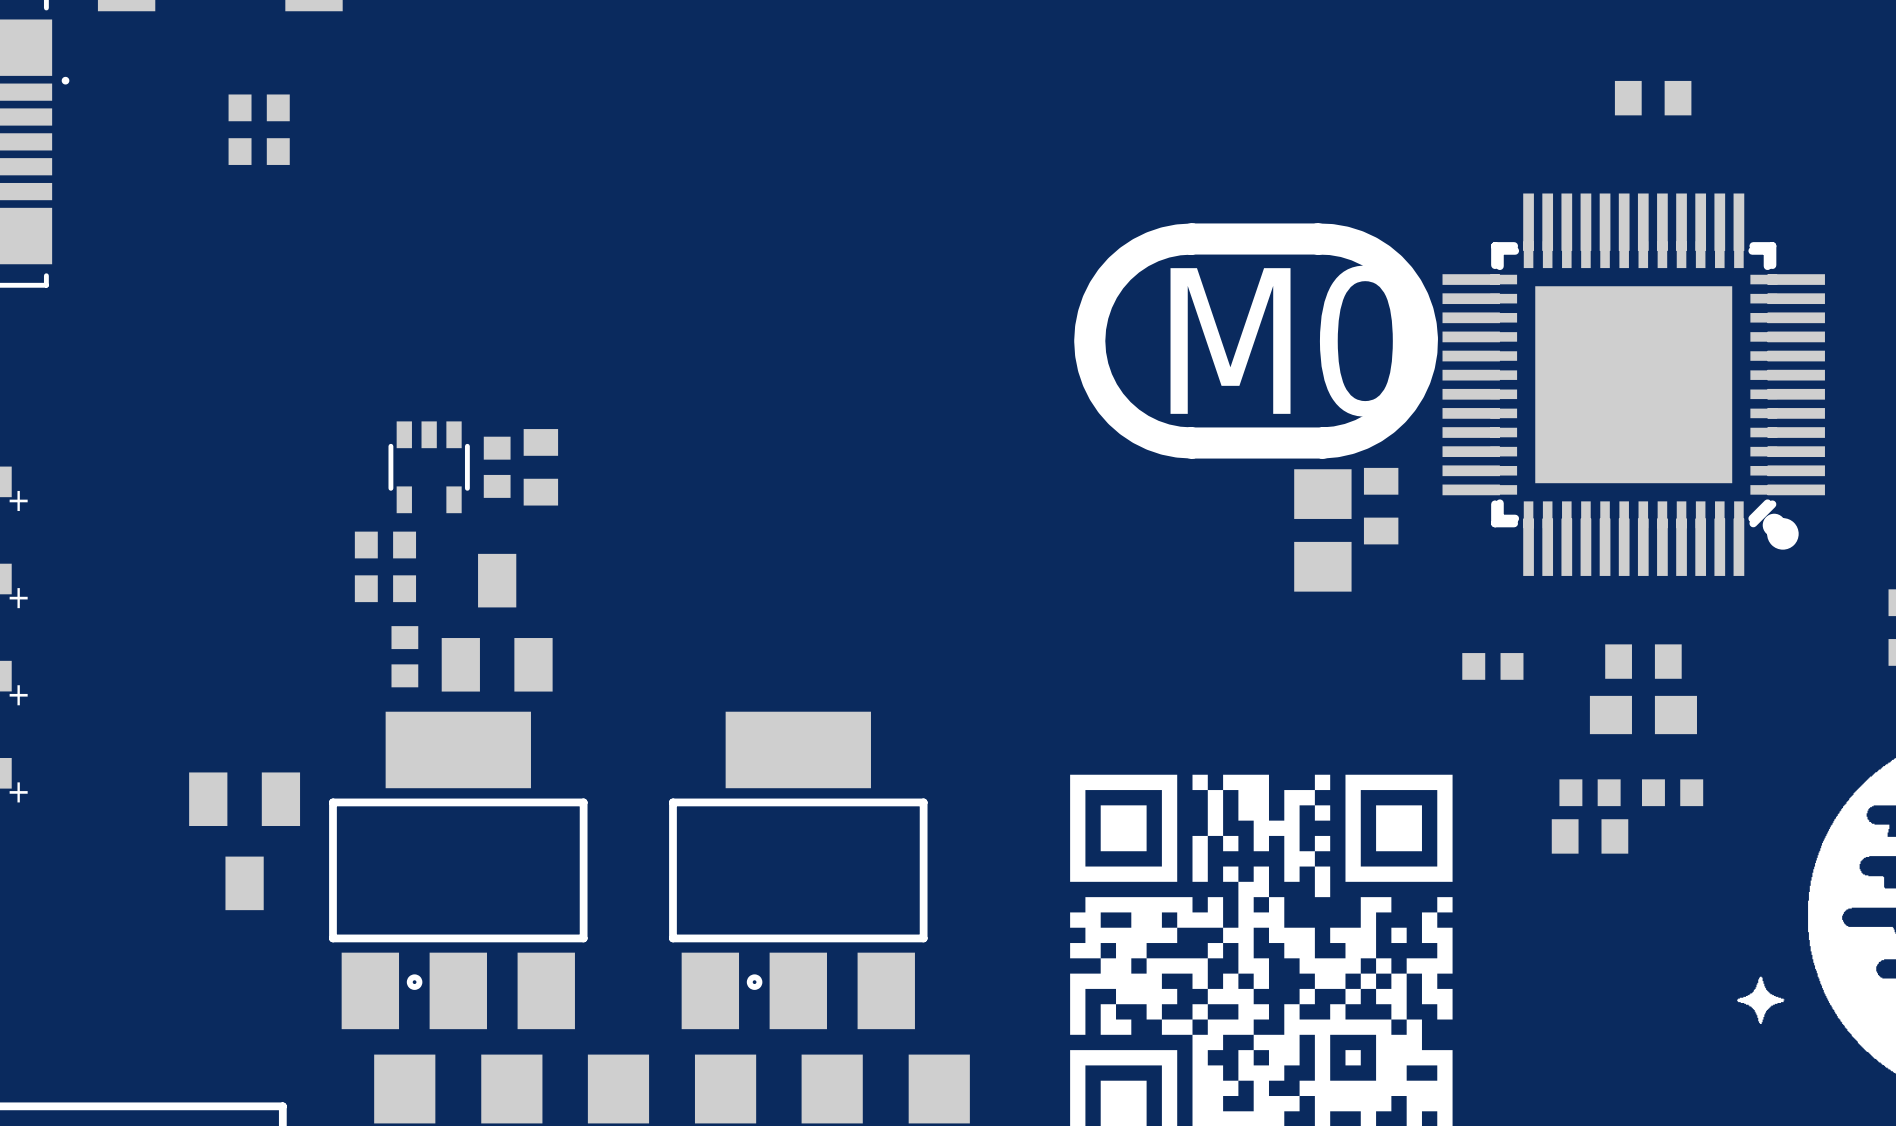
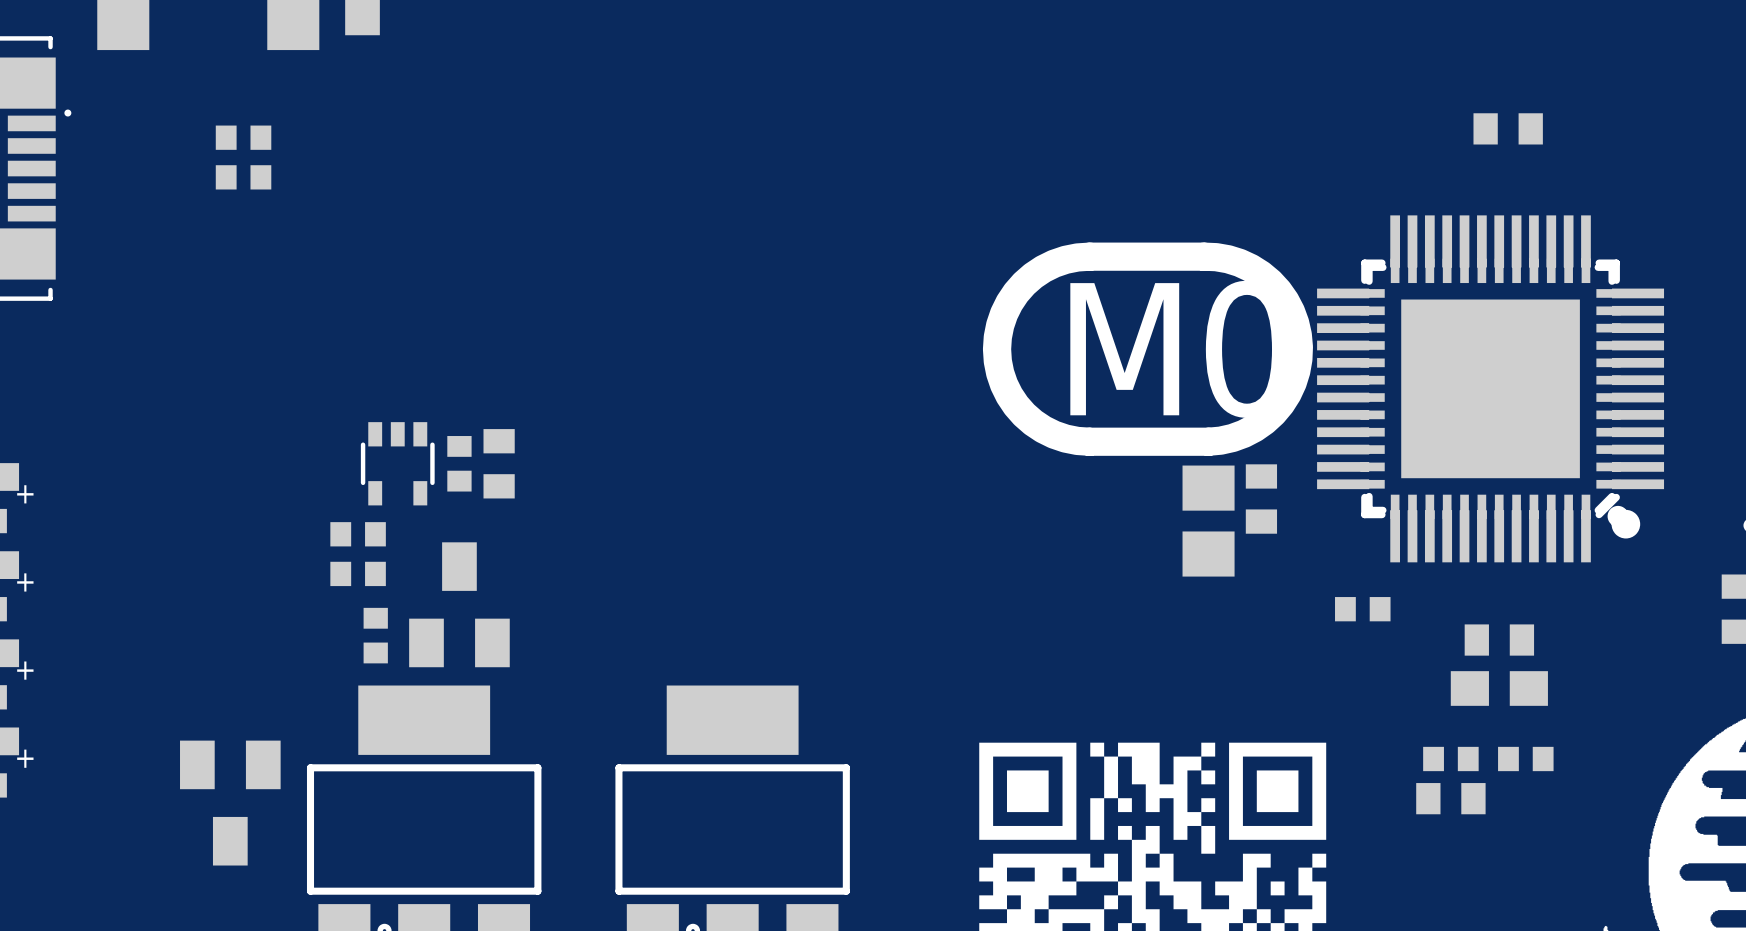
part position: (1492, 666) -> (1362, 609)

